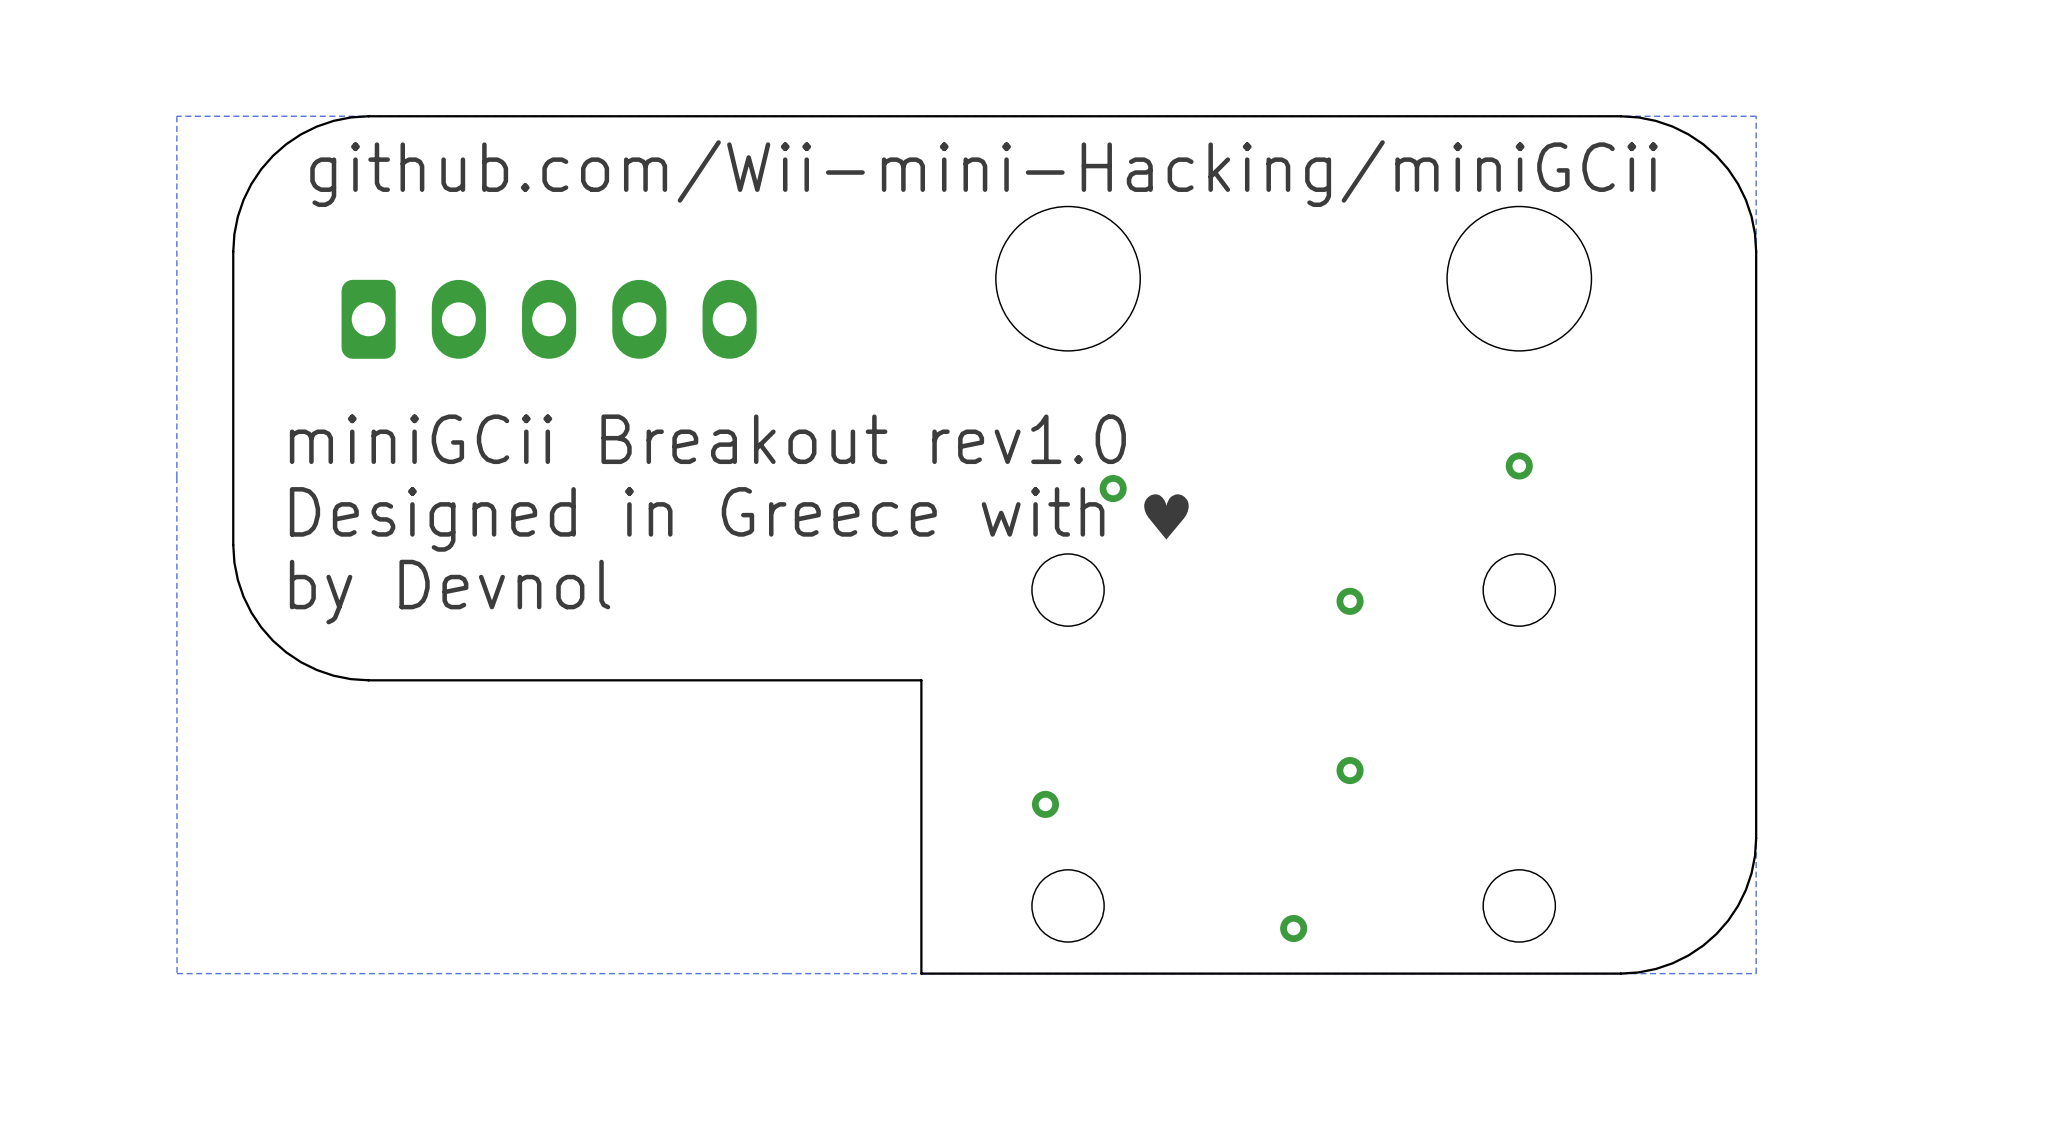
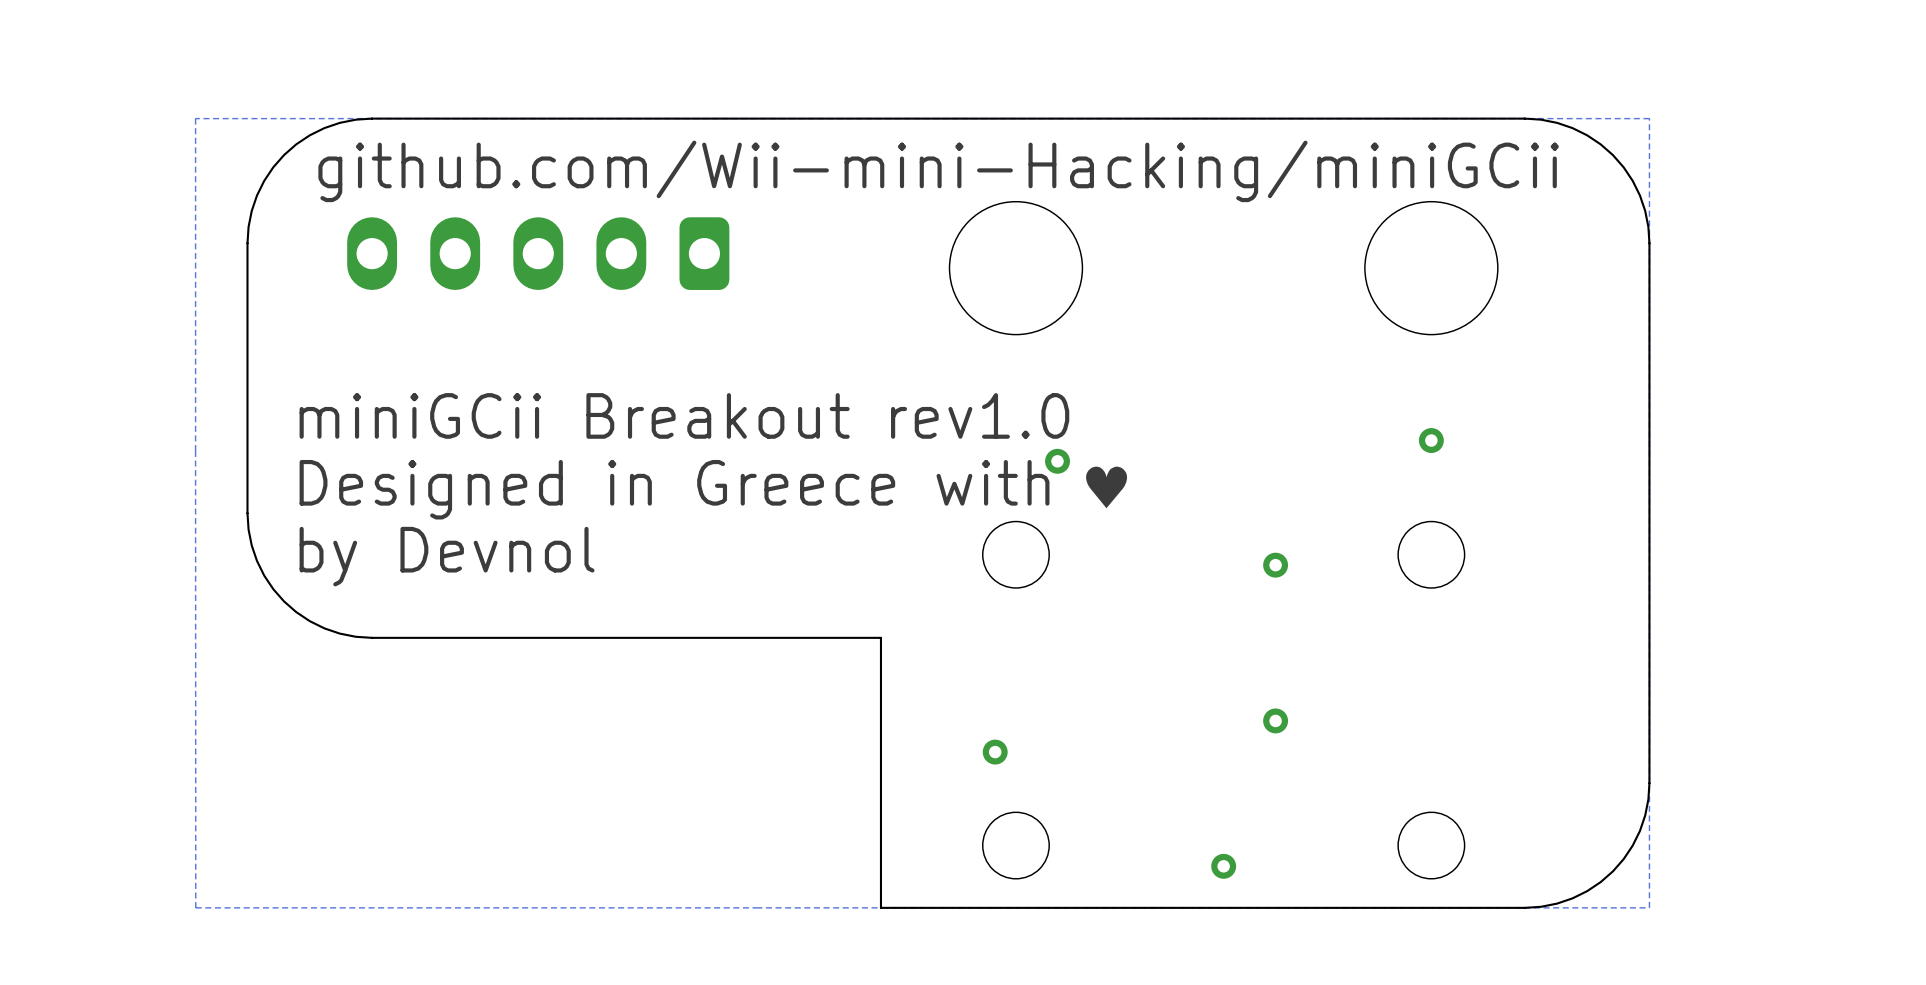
part rotation: 0° (549, 319) -> 180° (538, 253)

